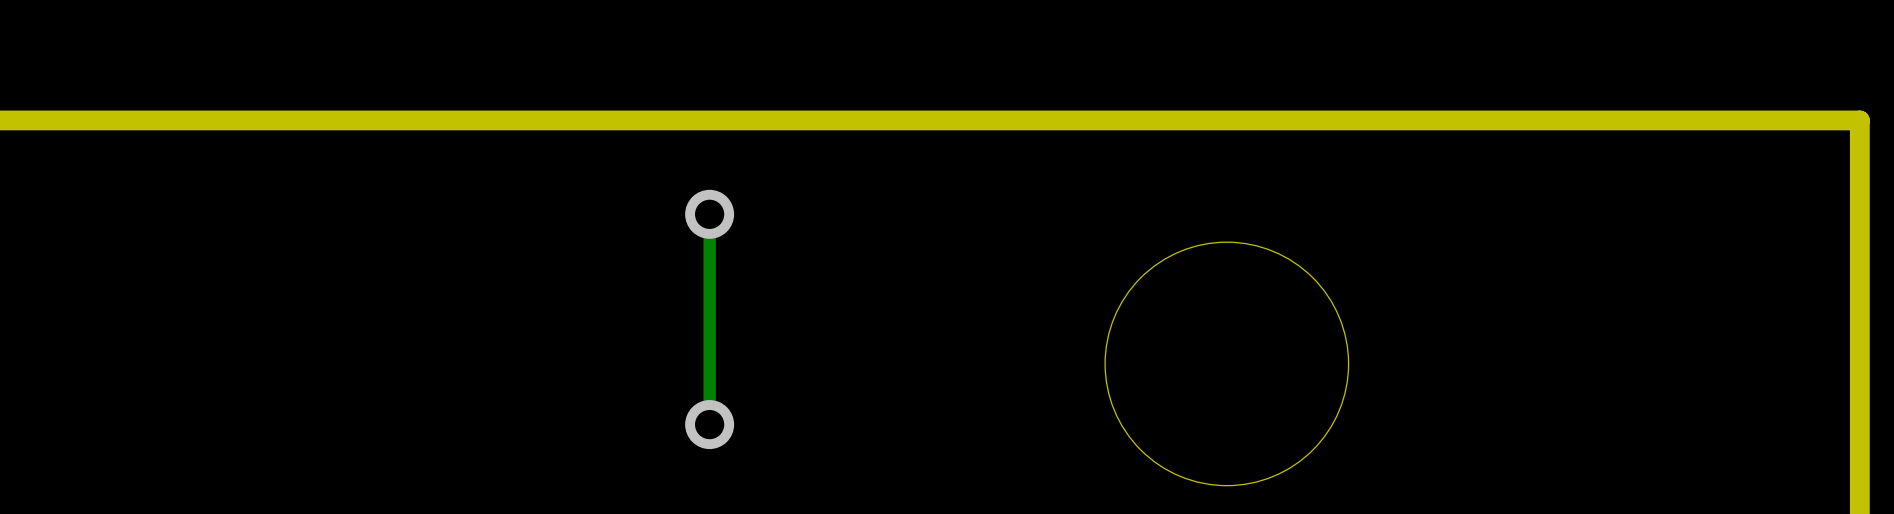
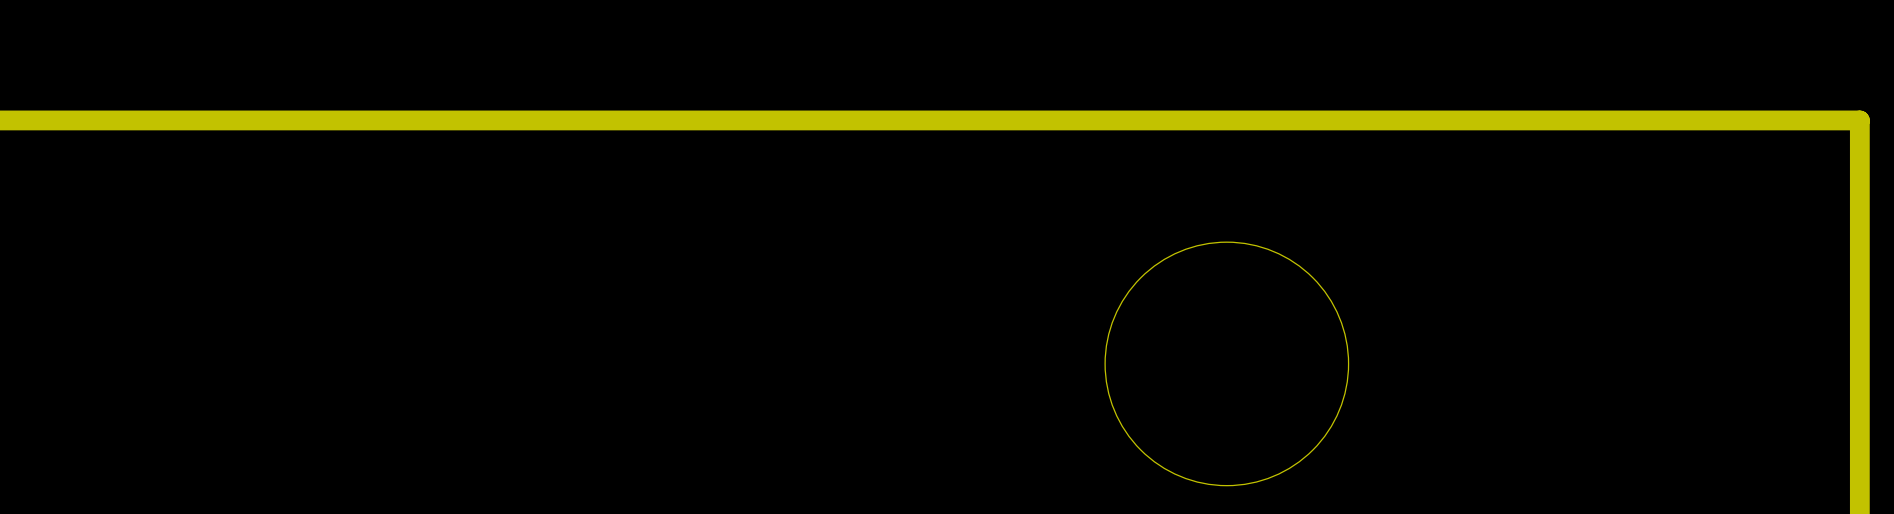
track: (709, 214) (709, 424) -> none
via: (709, 214) -> none
via: (709, 424) -> none

